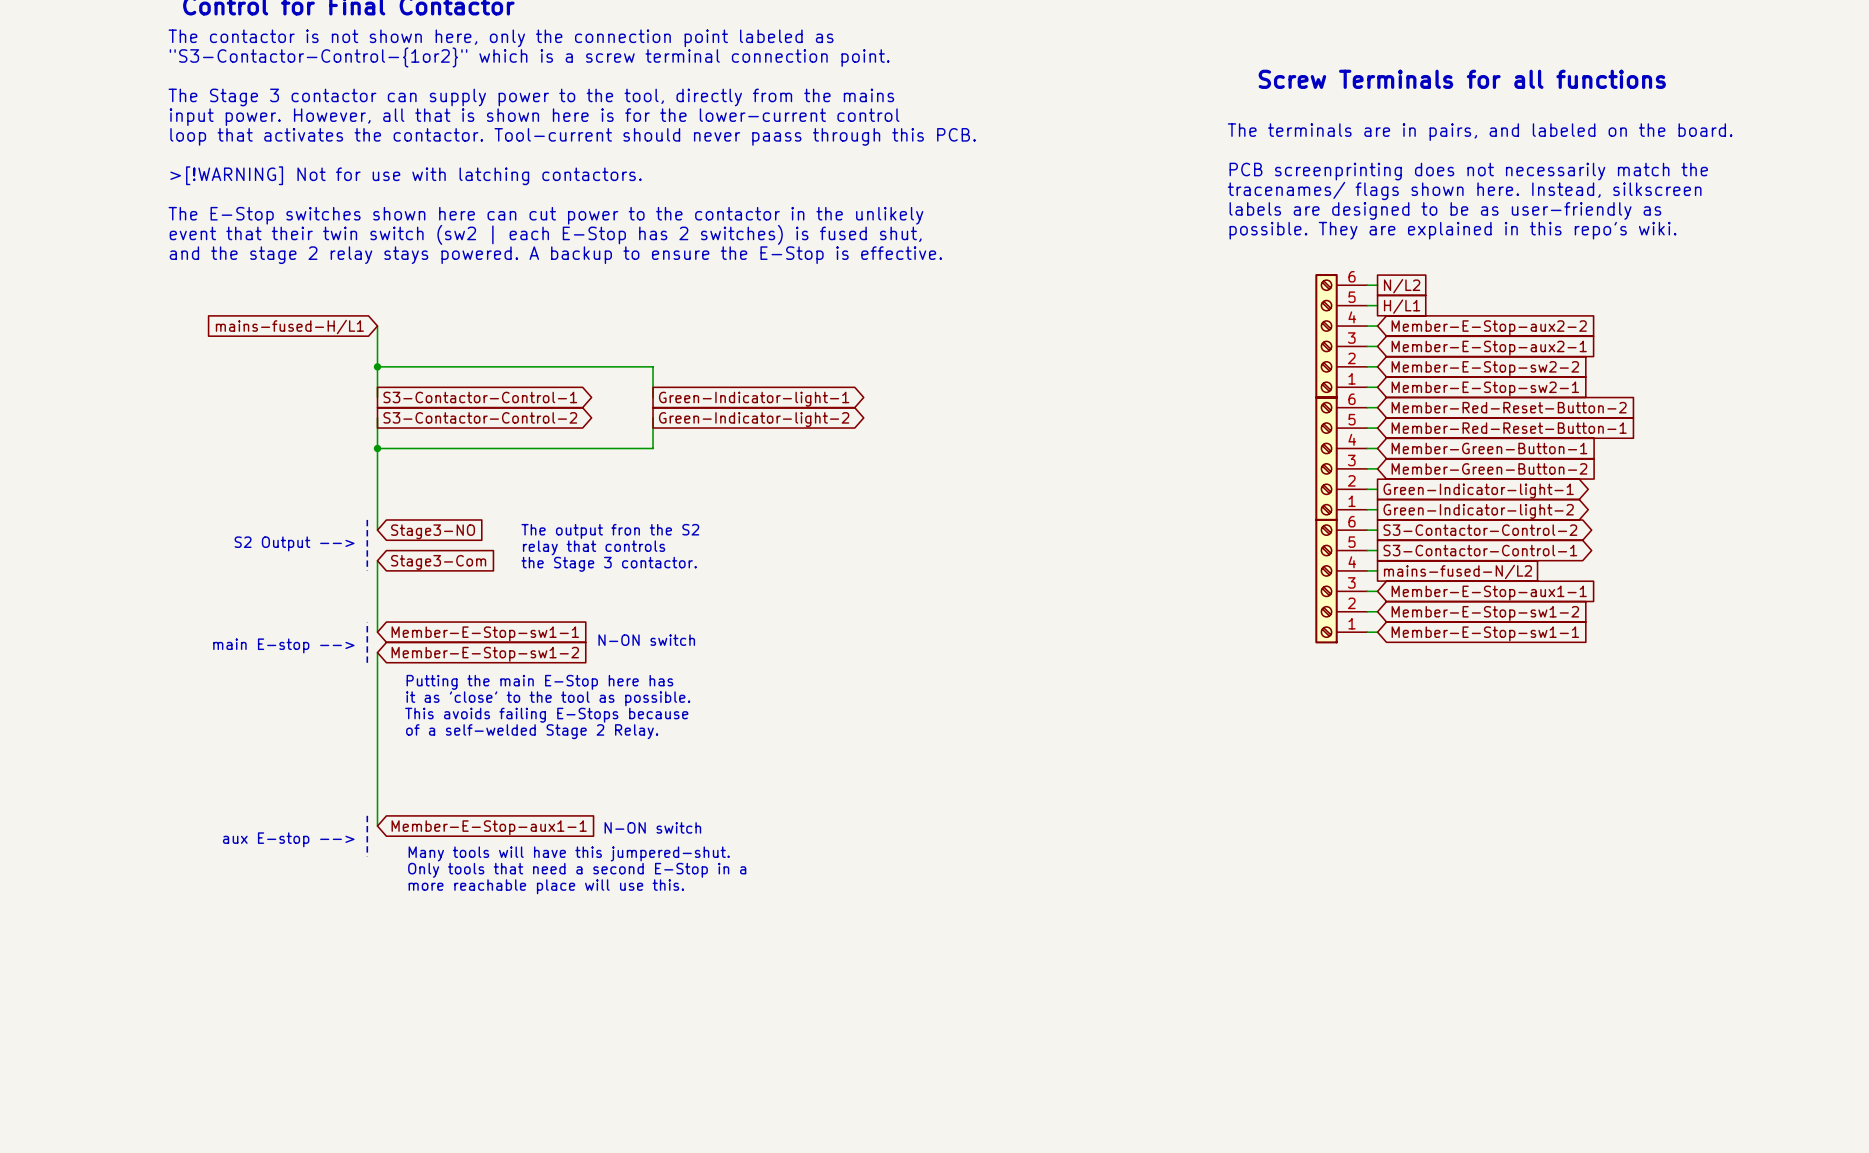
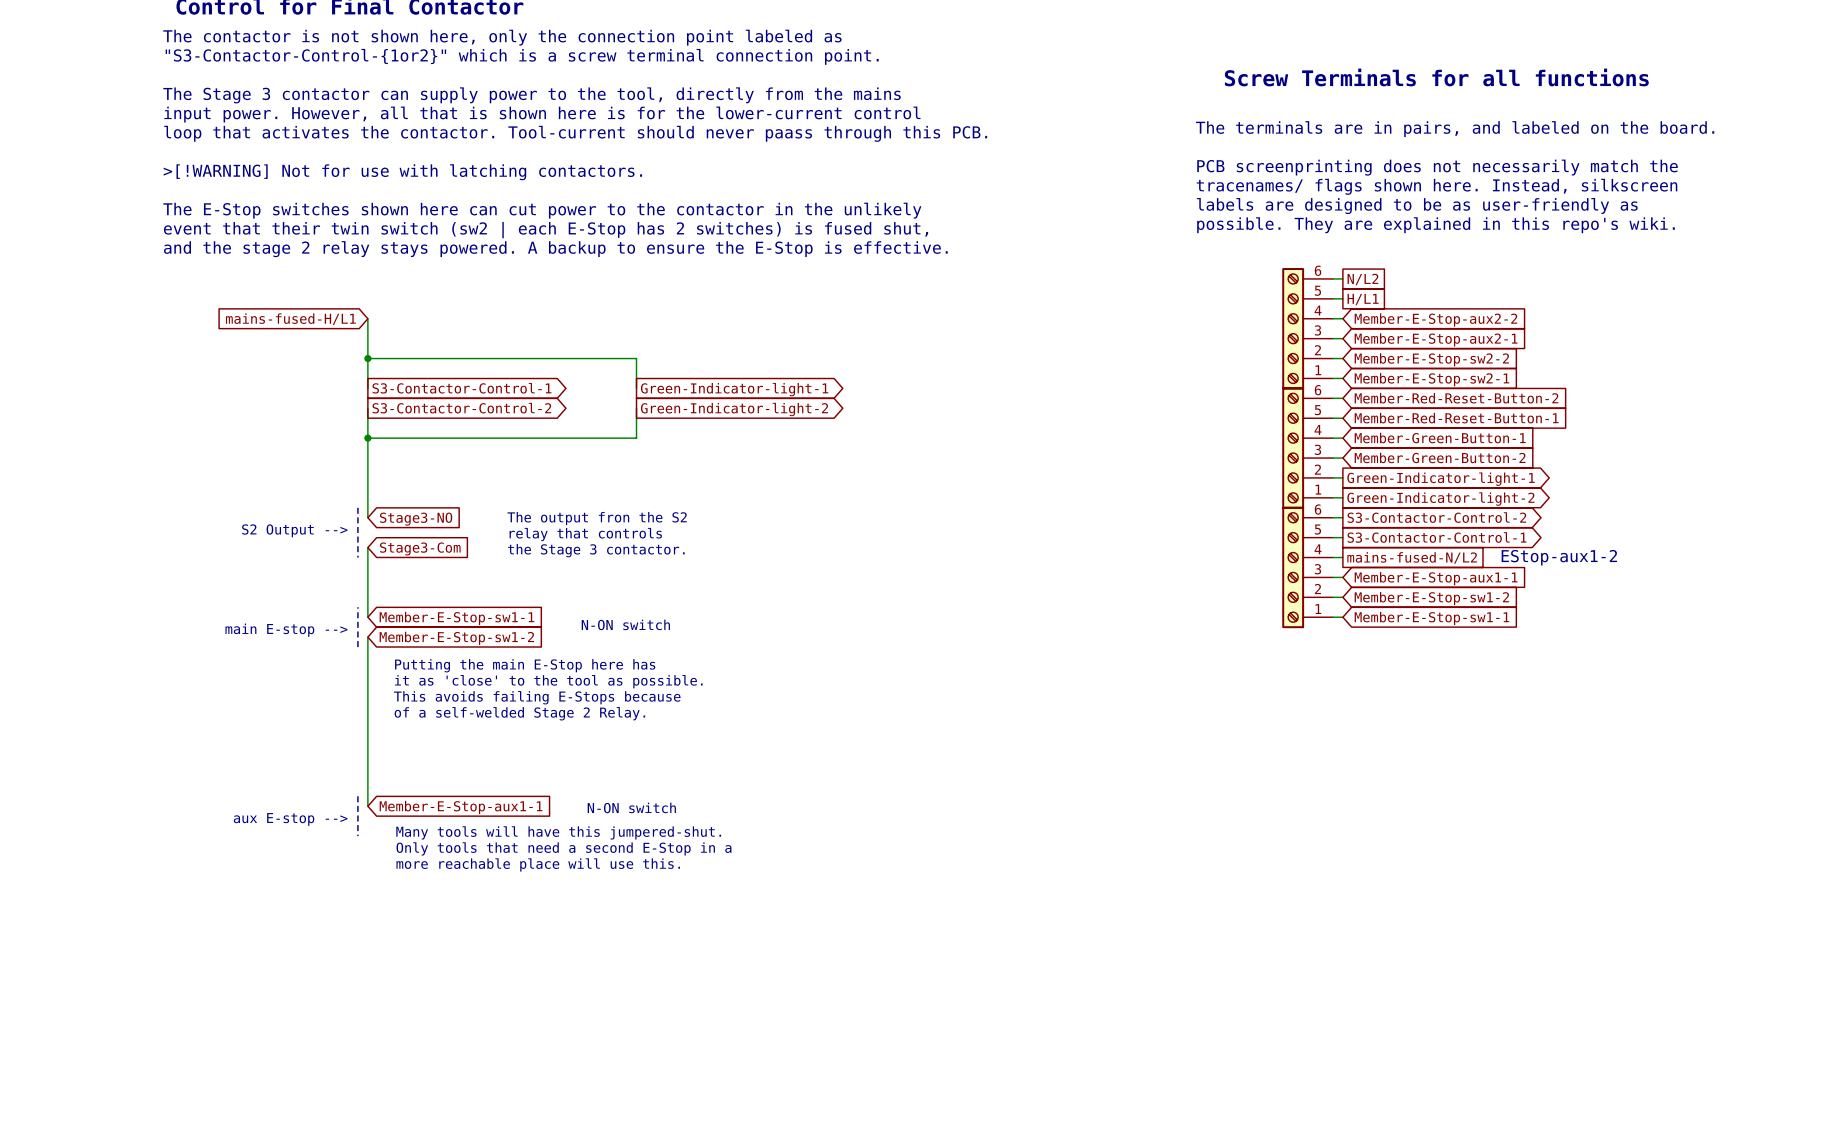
text: none -> EStop-aux1-2 (1559, 557)

